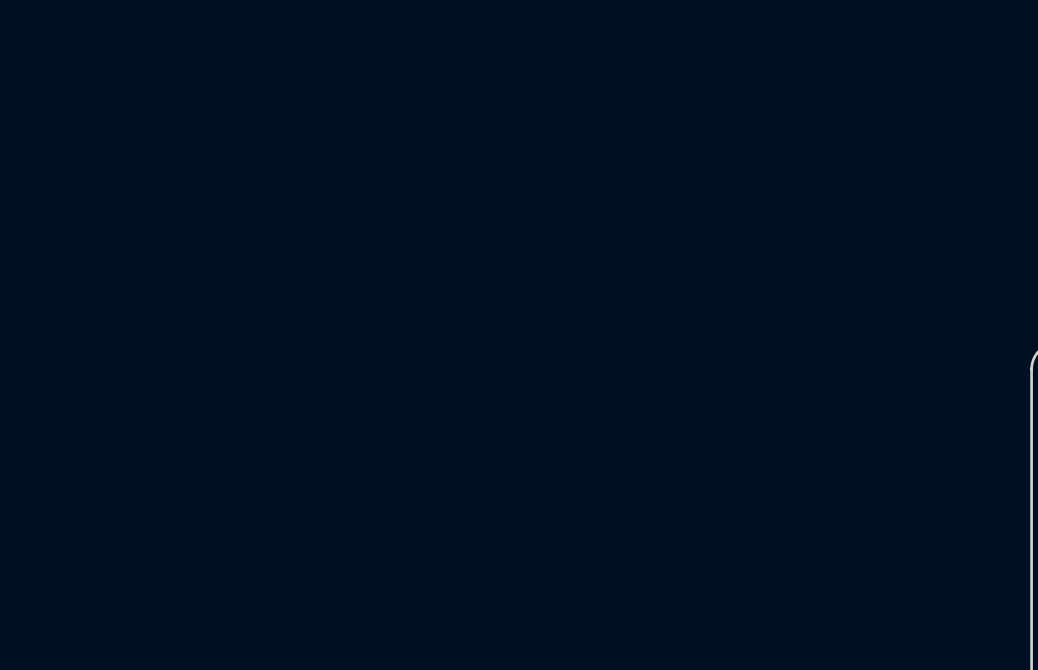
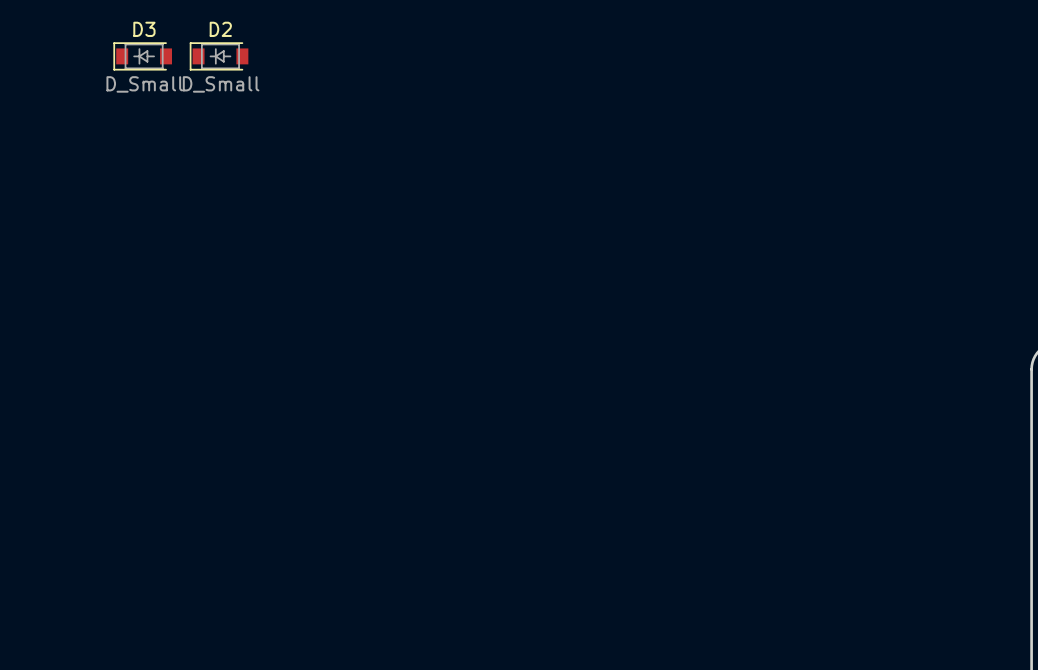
D3: none -> D_Small (142, 56)
D2: none -> D_Small (219, 56)

